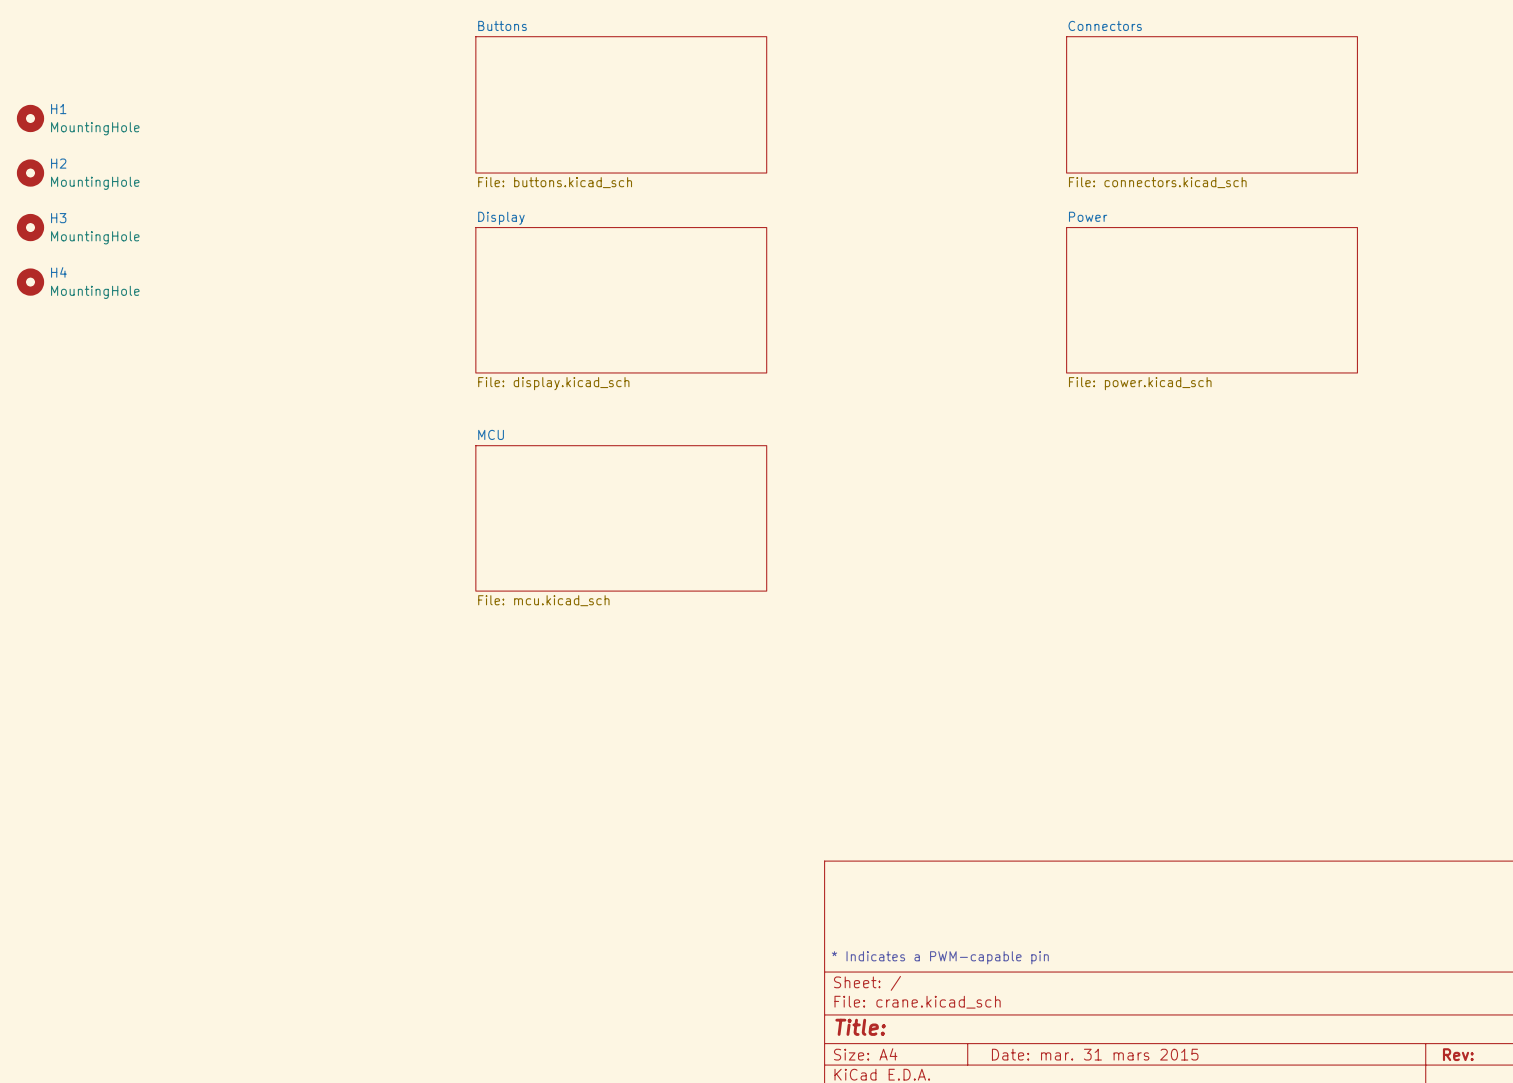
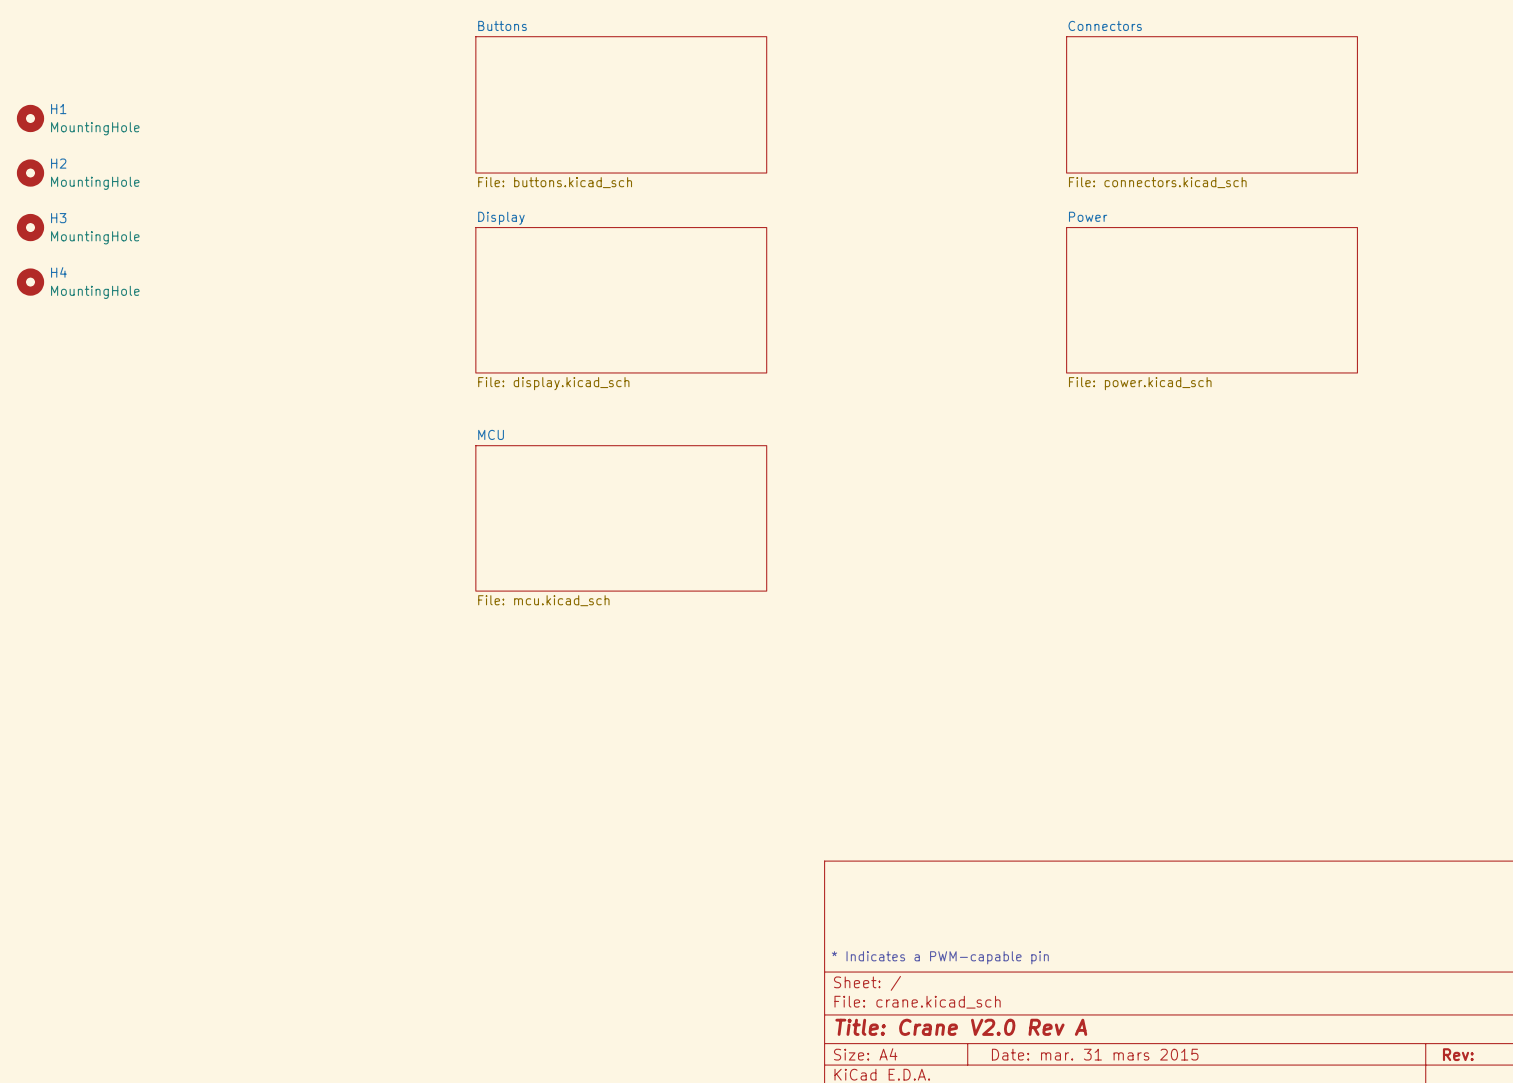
title block: Title: (860, 1027) -> Title: Crane V2.0 Rev A (961, 1027)

